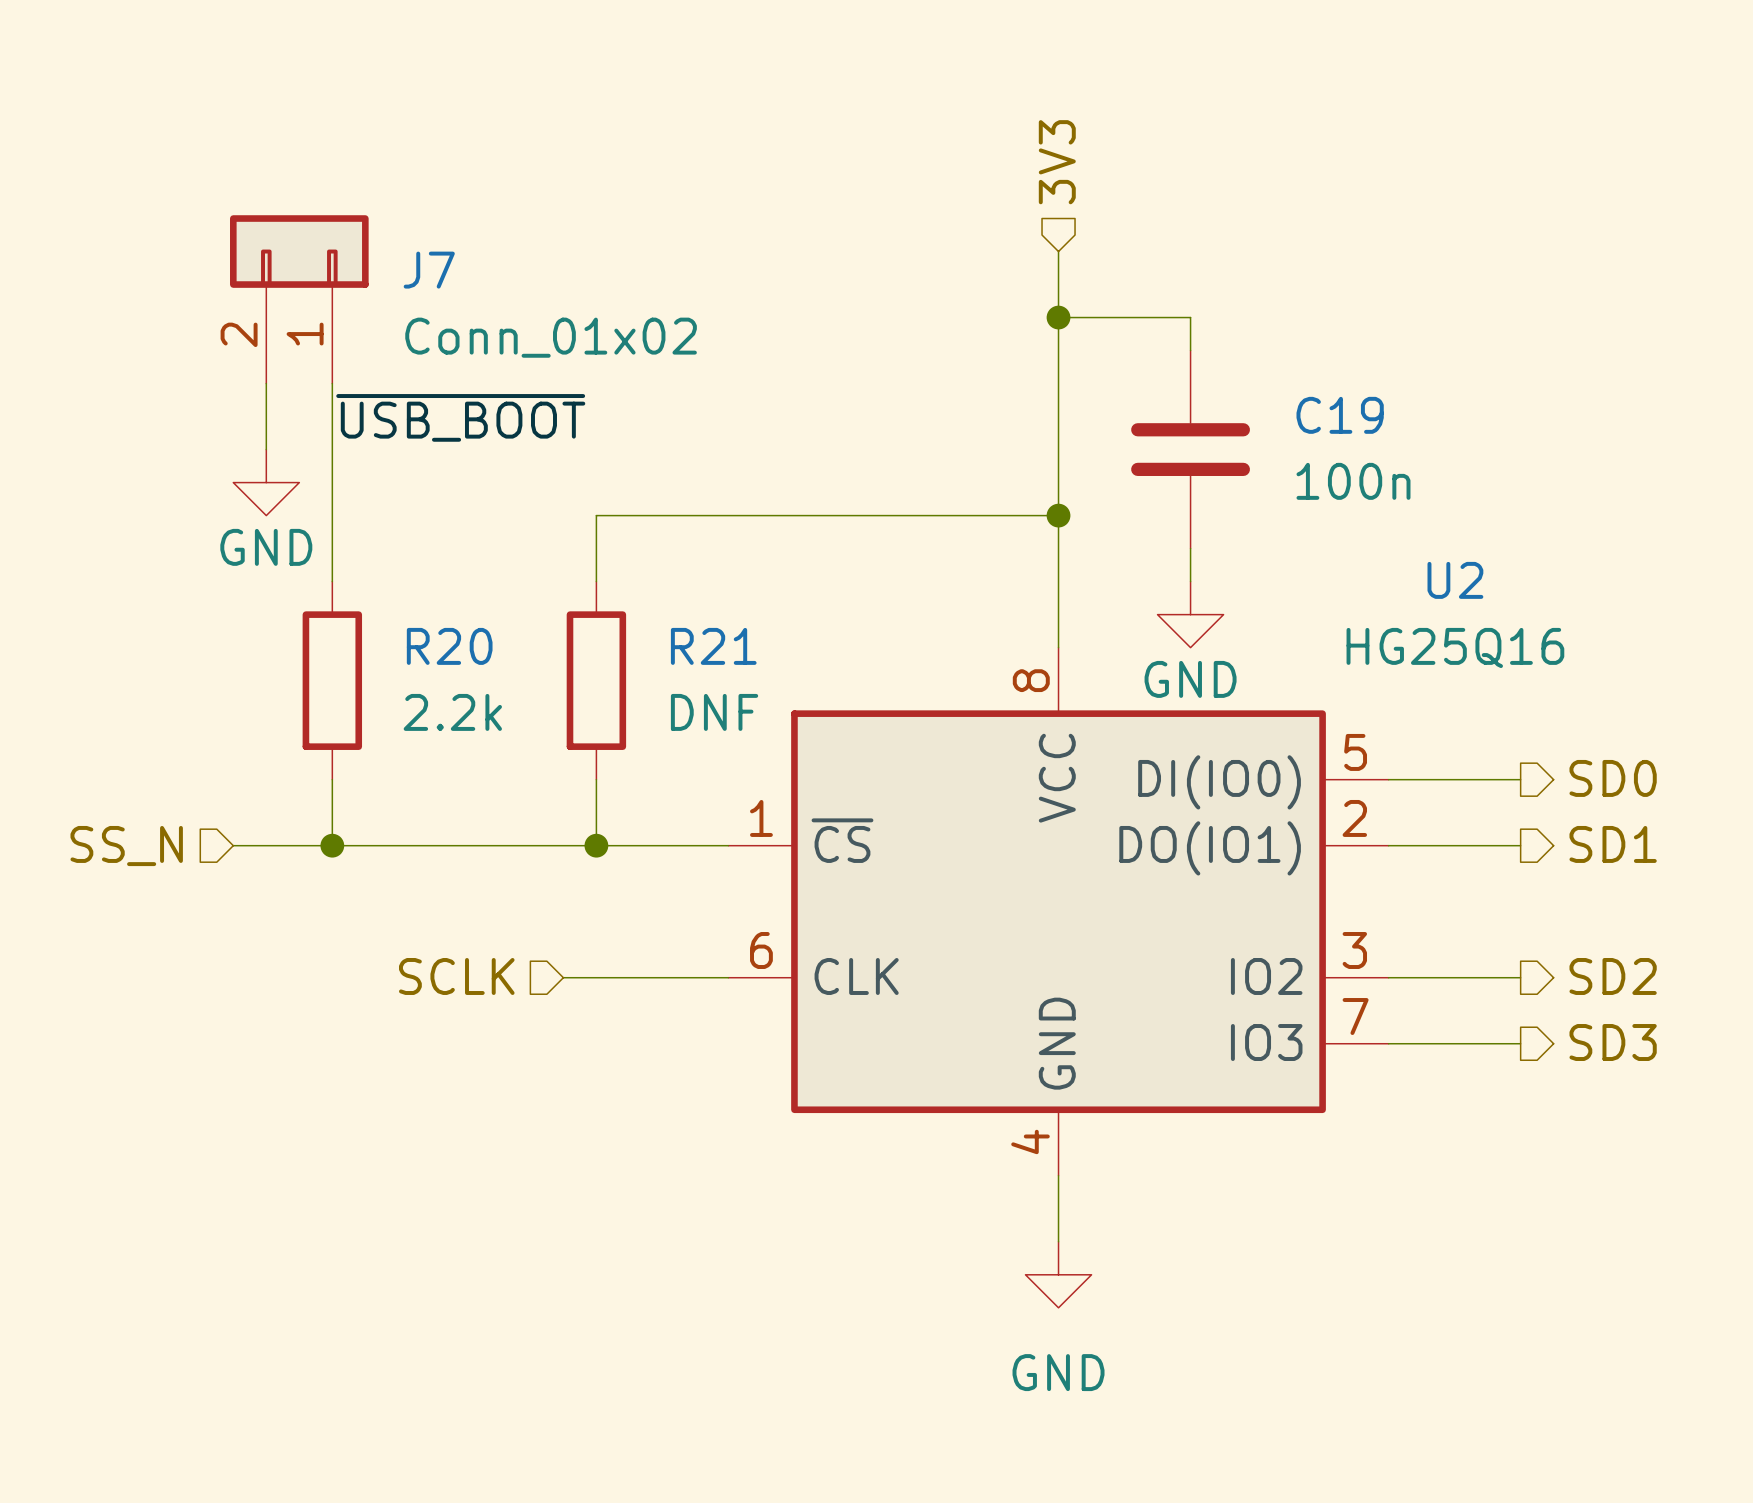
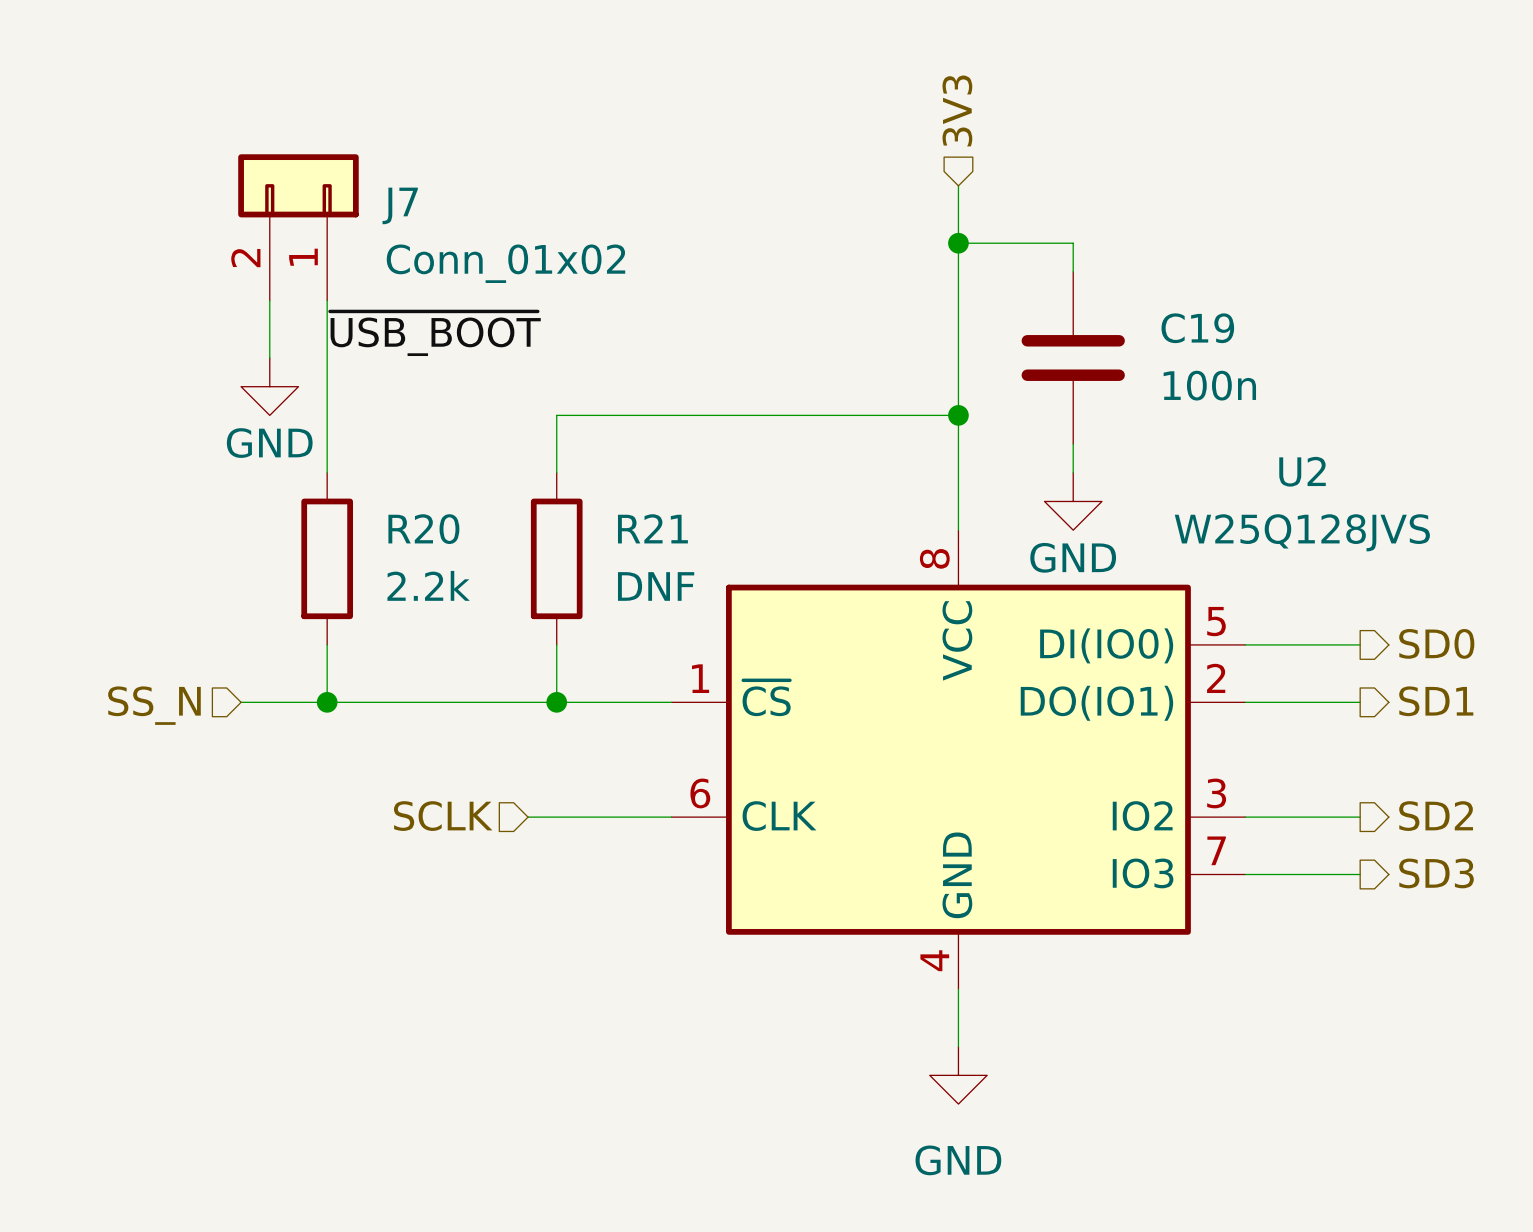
U2 value: HG25Q16 (1455, 647) -> W25Q128JVS (1302, 532)

